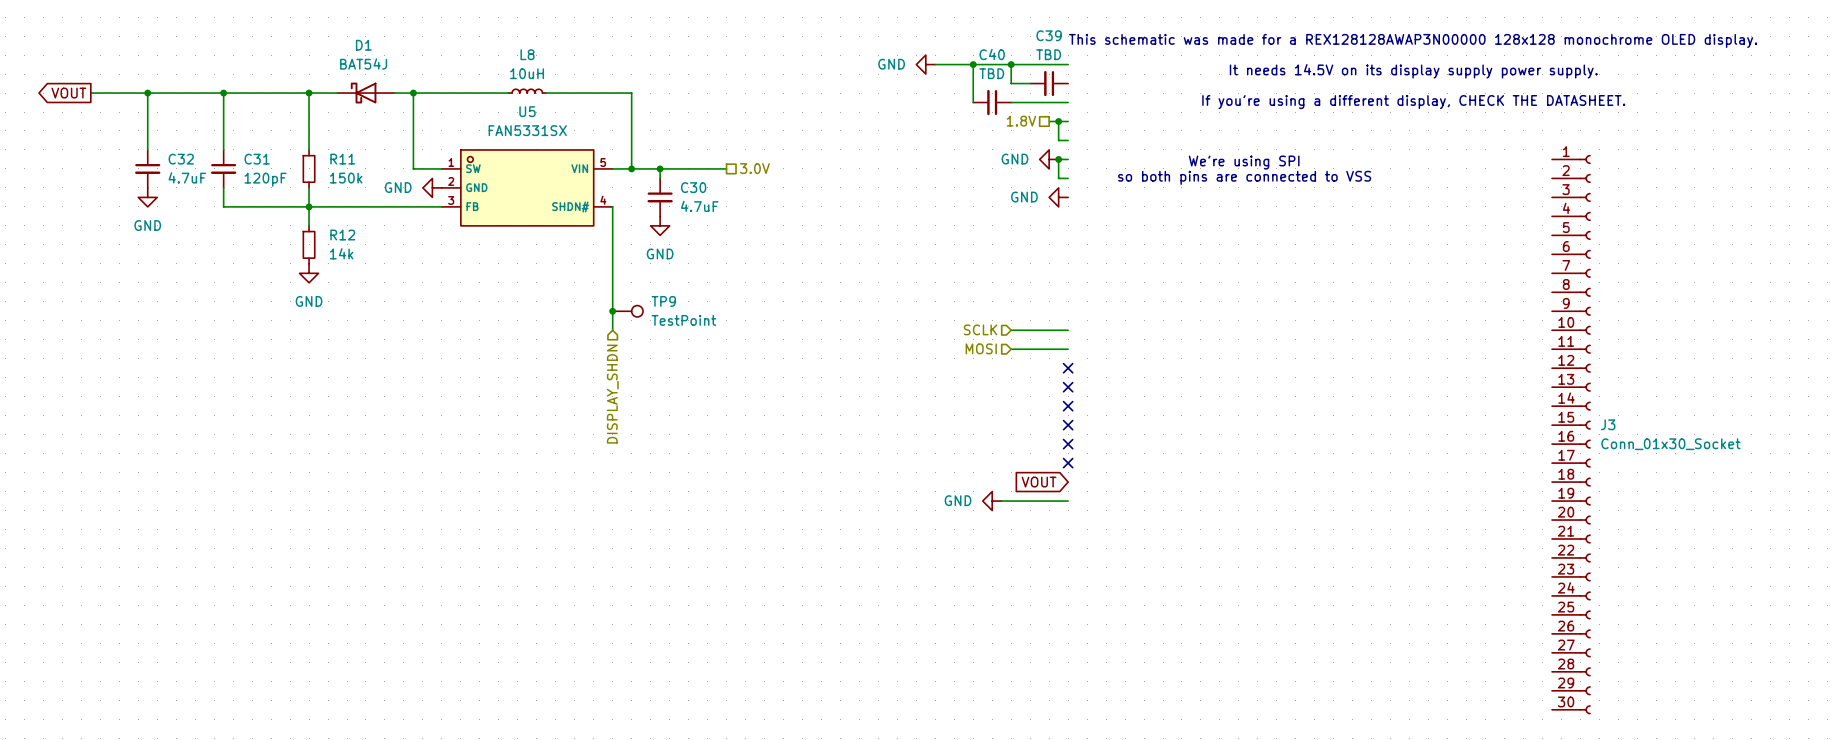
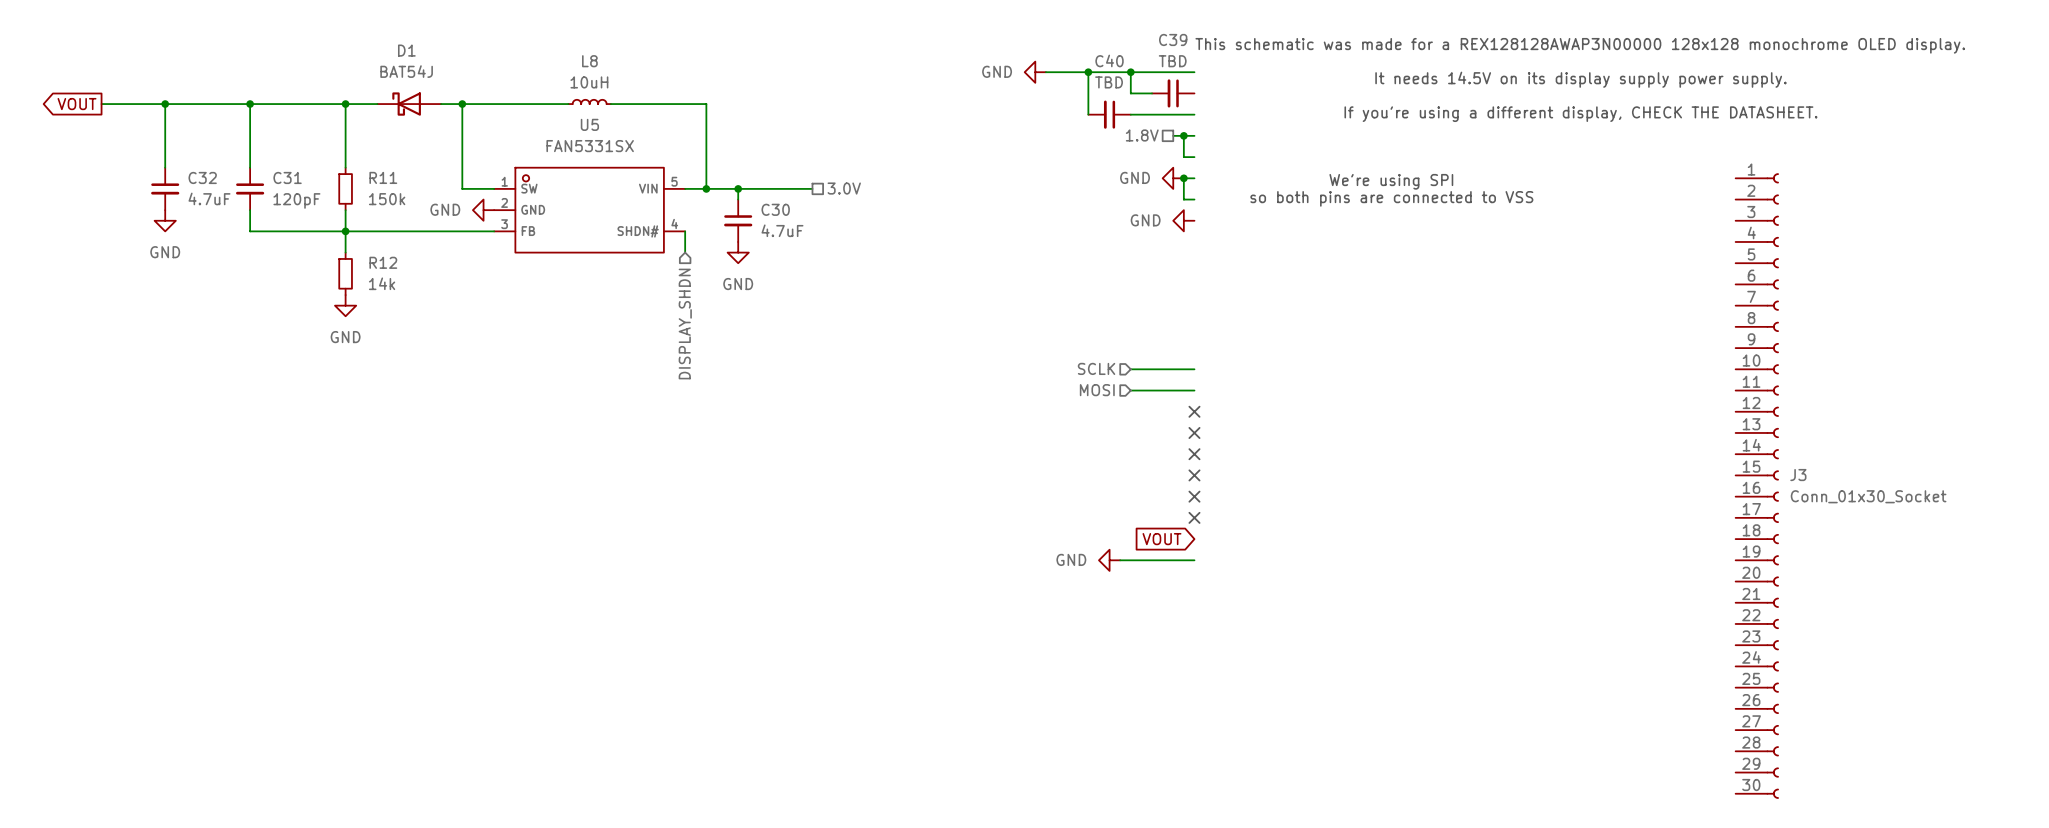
wire: (612, 225) (612, 330) -> none
junction: (612, 311) -> none
TP9: TestPoint (627, 311) -> none
hierarchical label position: DISPLAY_SHDN (612, 394) -> DISPLAY_SHDN (685, 324)

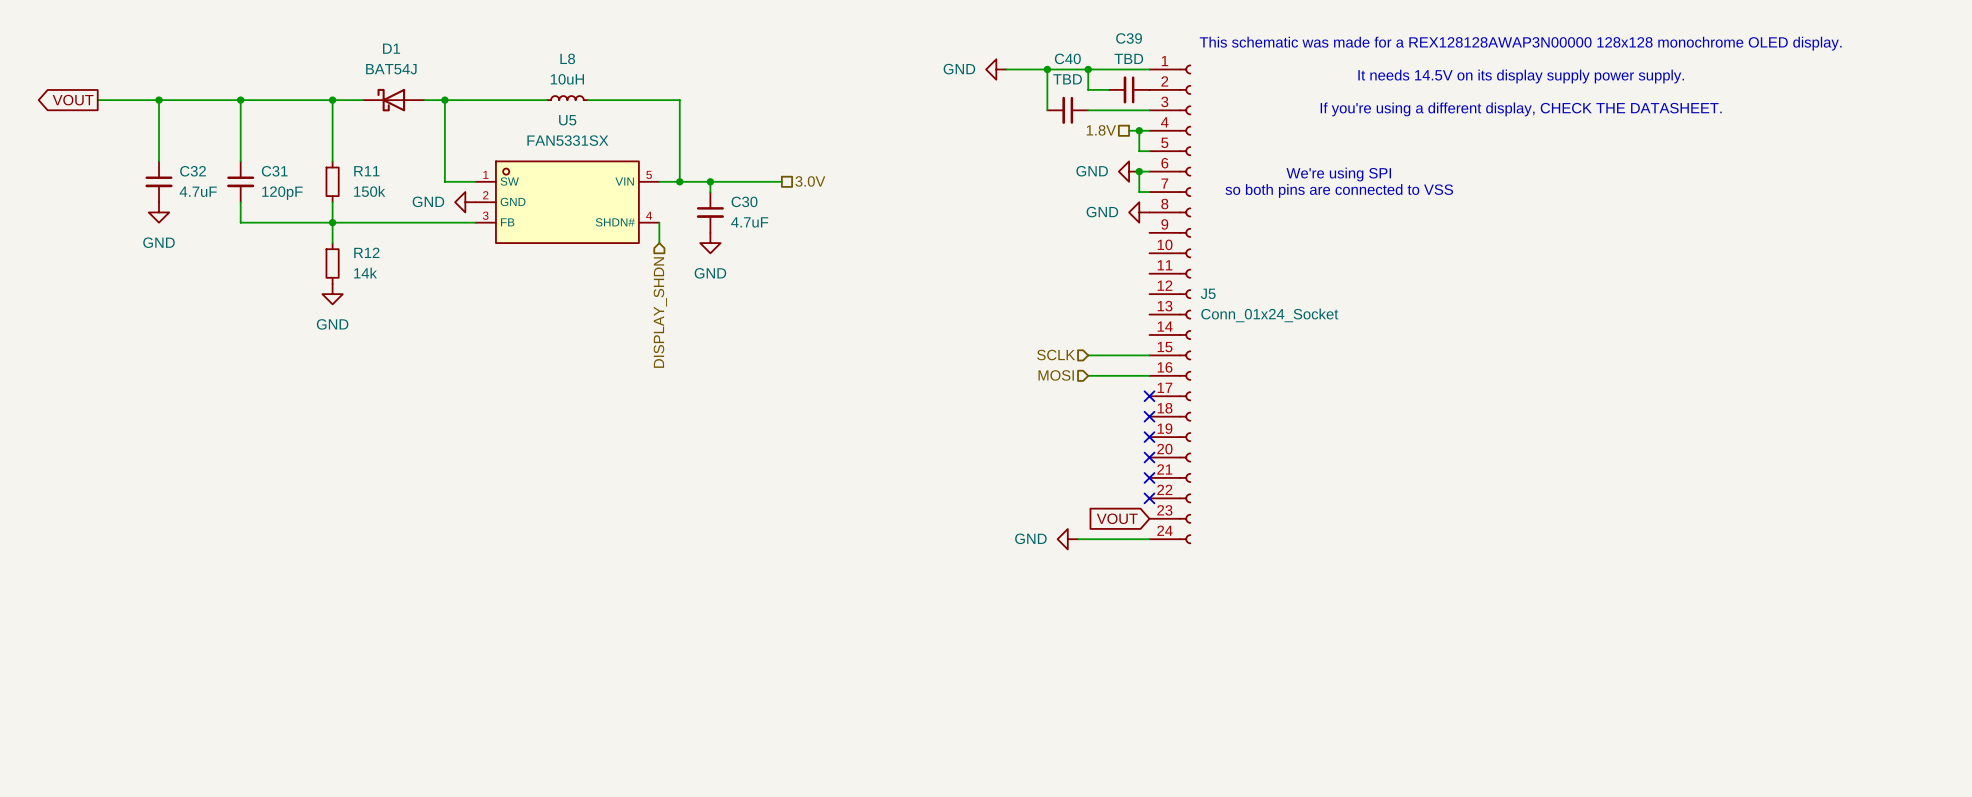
J5: none -> Conn_01x24_Socket (1170, 304)
J3: Conn_01x30_Socket (1757, 486) -> none

